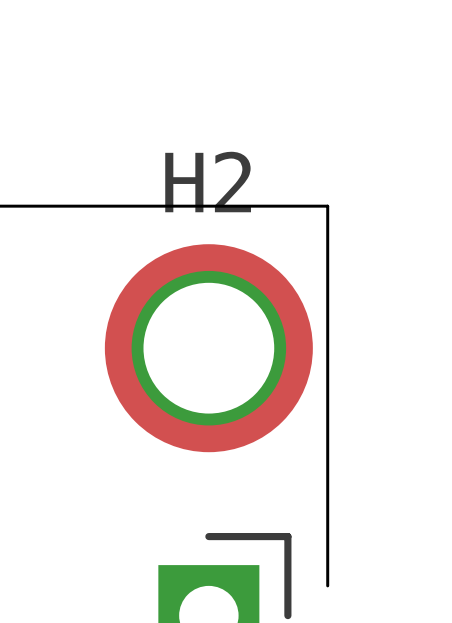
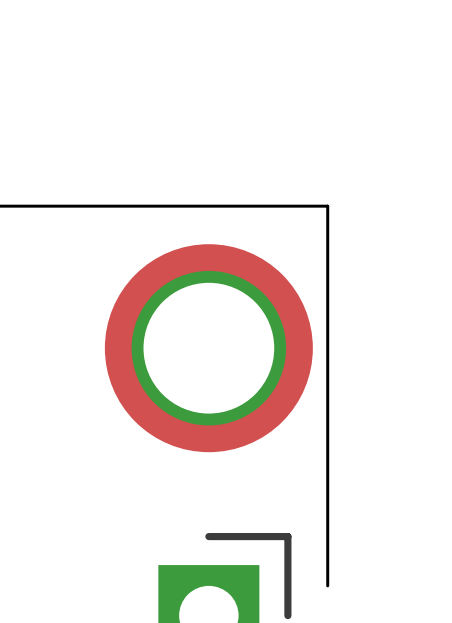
H2 name: H2 (208, 182) -> none

